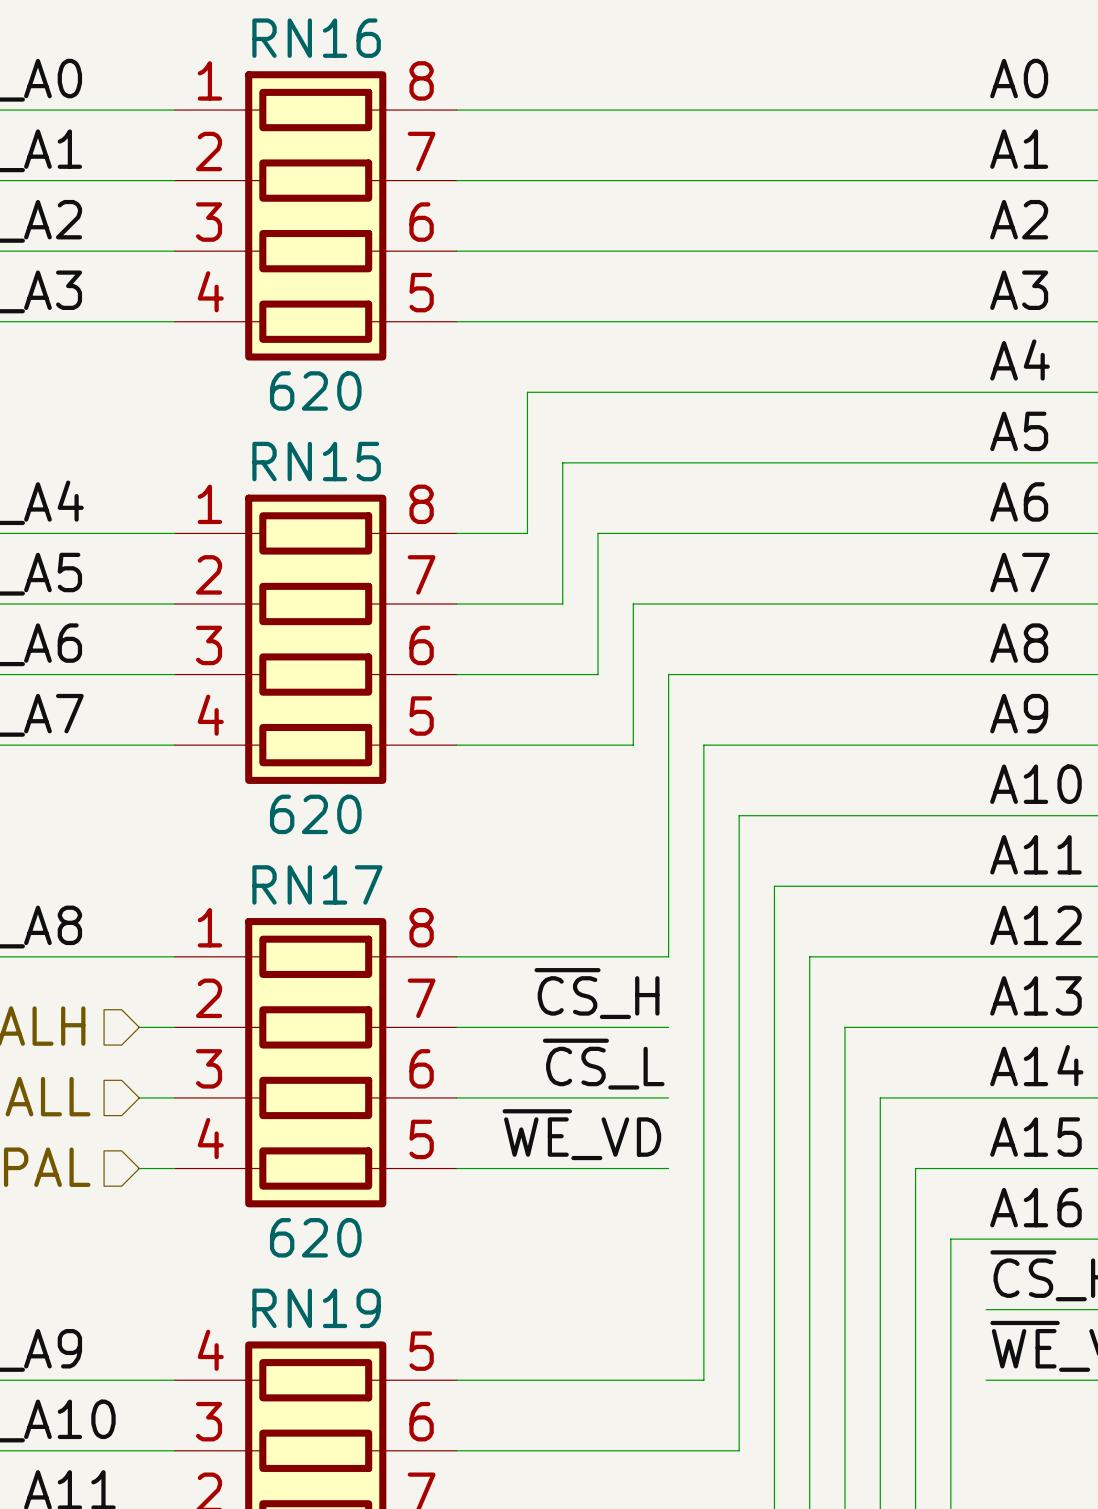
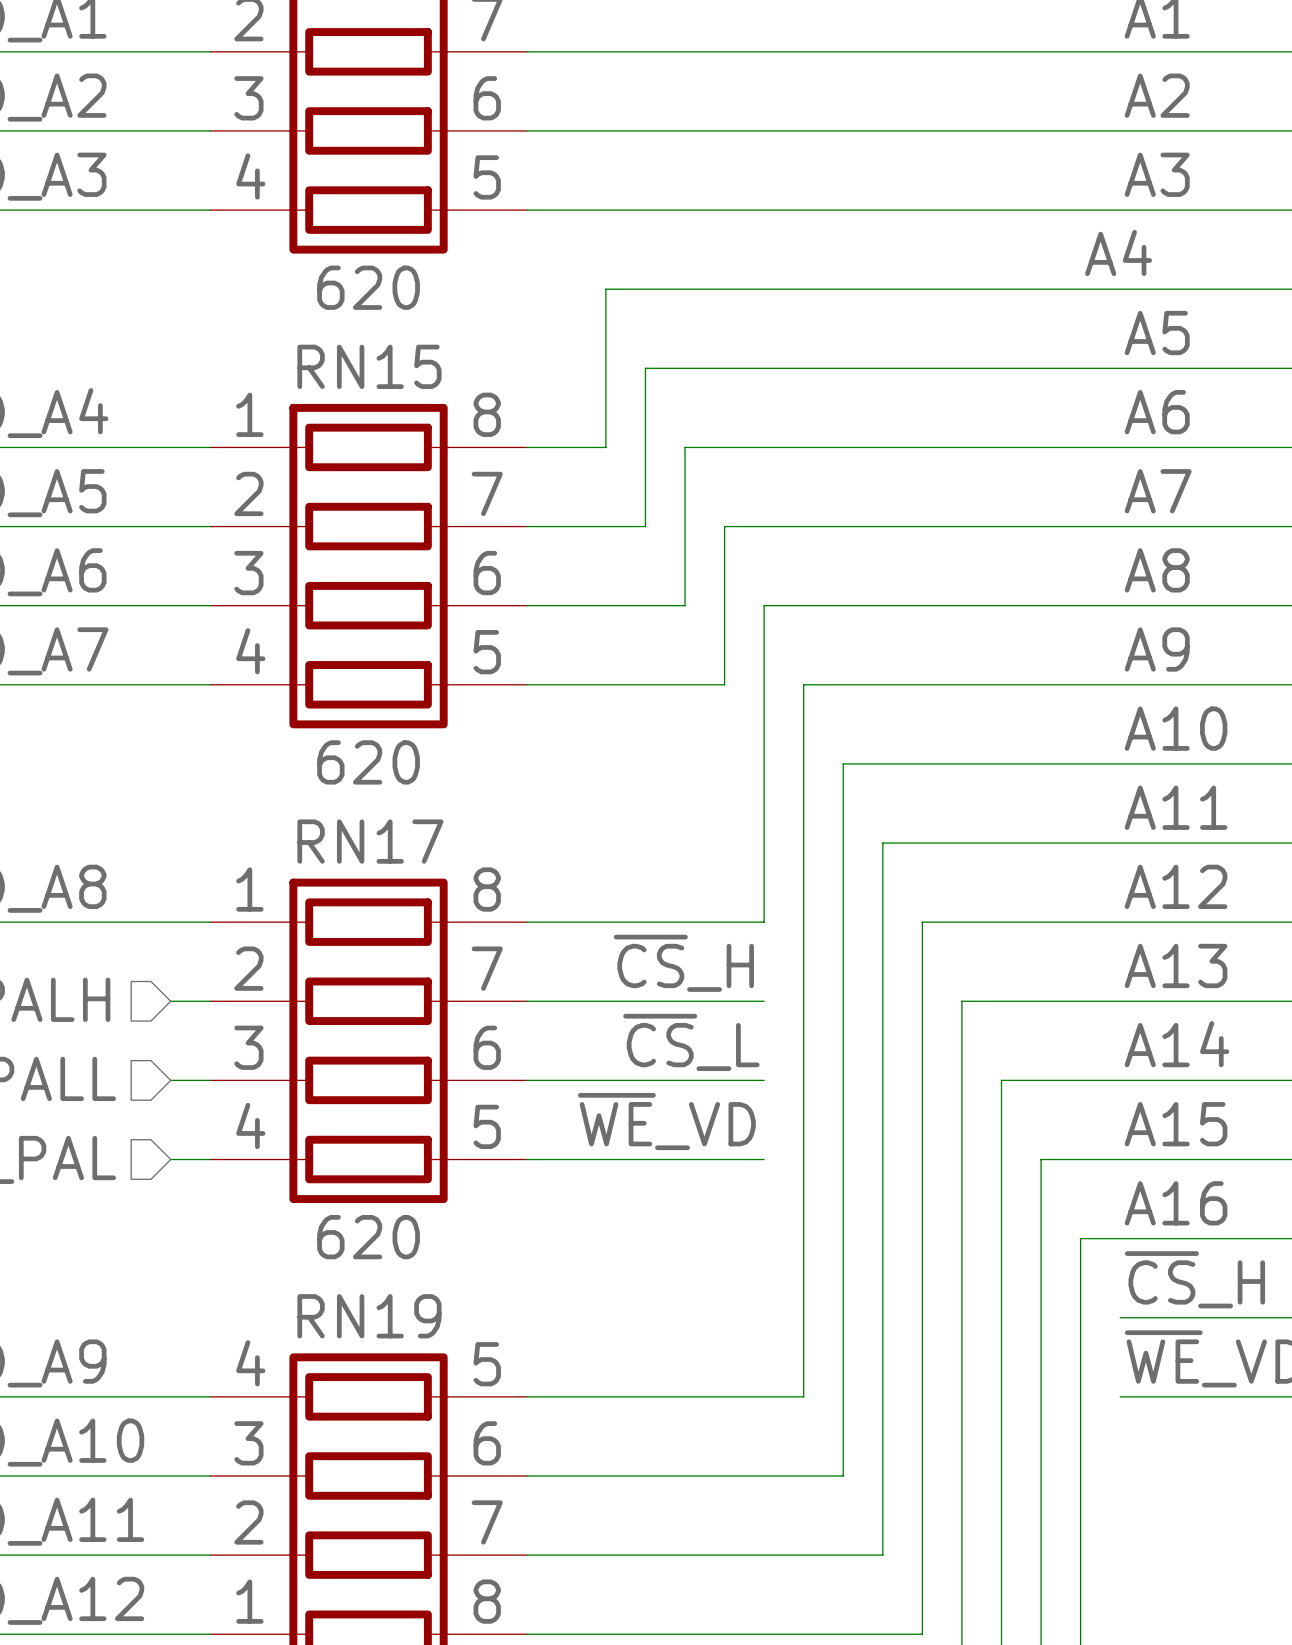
label position: A4 (1020, 359) -> A4 (1118, 252)

